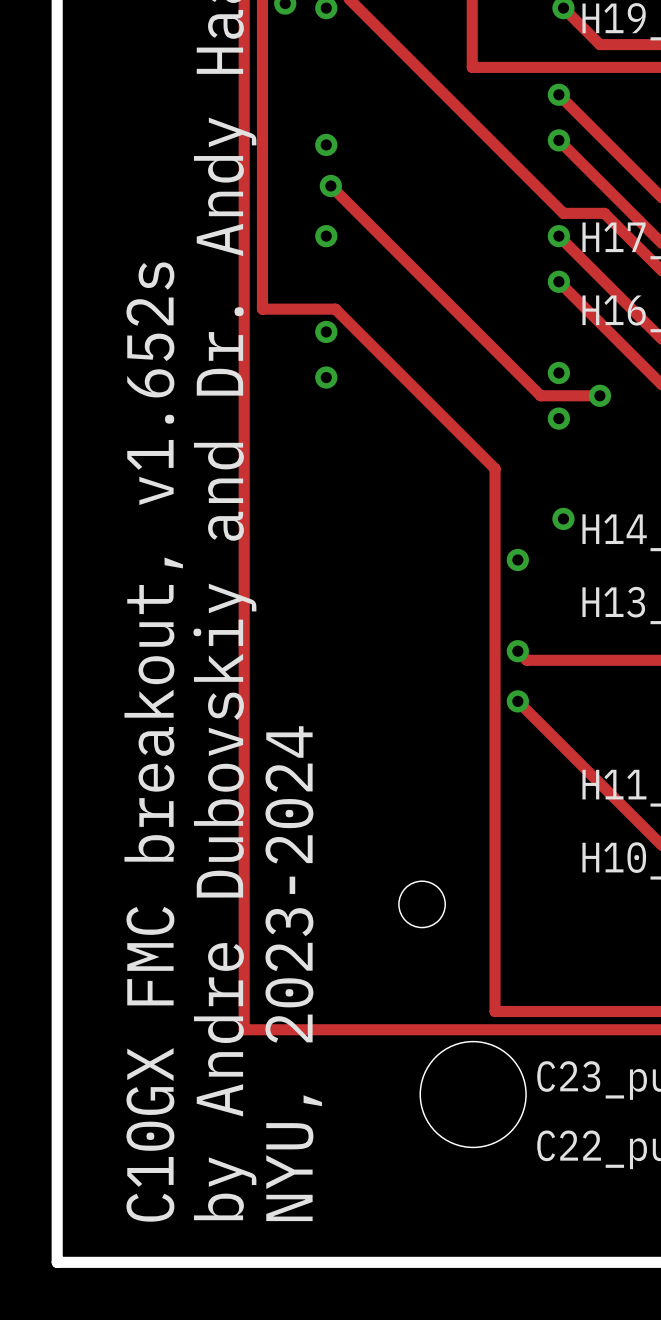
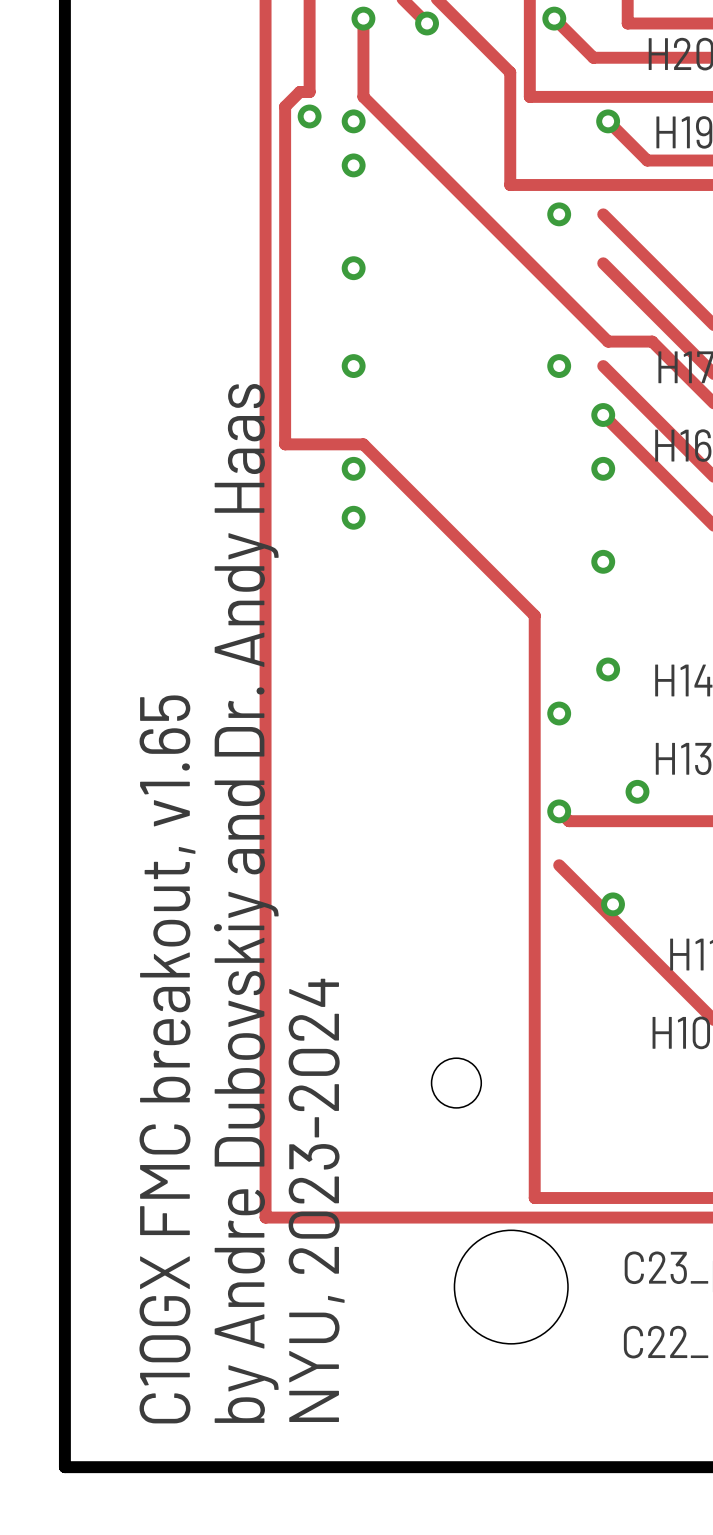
via: none -> (353, 165)
via: none -> (559, 214)
via: (558, 94) -> none
via: (558, 140) -> none
track: (330, 185) (540, 395) (599, 395) -> none
via: (330, 185) -> none
via position: (558, 236) -> (559, 366)
via: none -> (603, 468)
via: (558, 372) -> none
via: (599, 395) -> none
via: none -> (637, 791)
via: (517, 701) -> none
via: none -> (613, 904)
text: C10GX FMC breakout, v1.652s (153, 742) -> C10GX FMC breakout, v1.65 (167, 1059)

